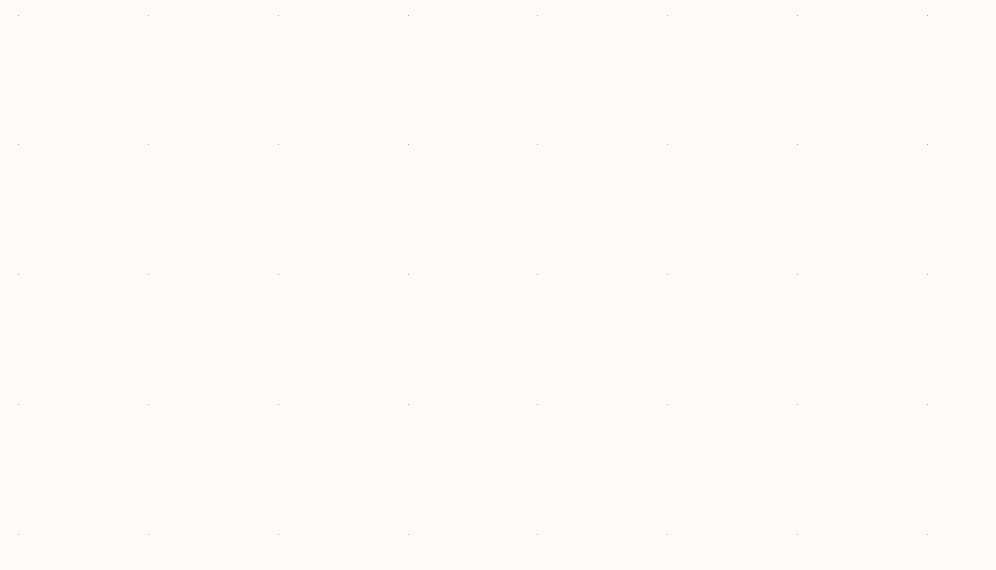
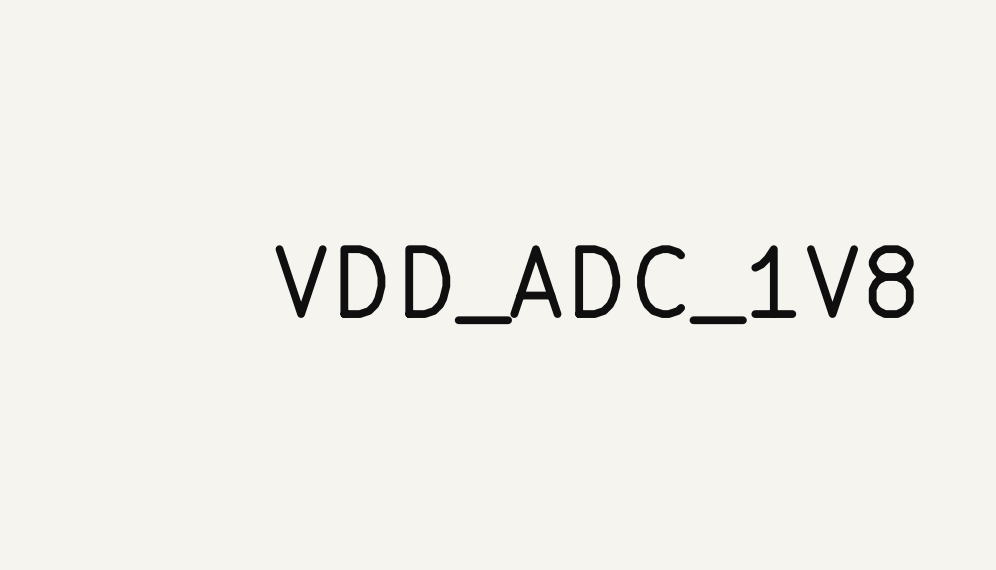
label: none -> VDD_ADC_1V8 (594, 284)

